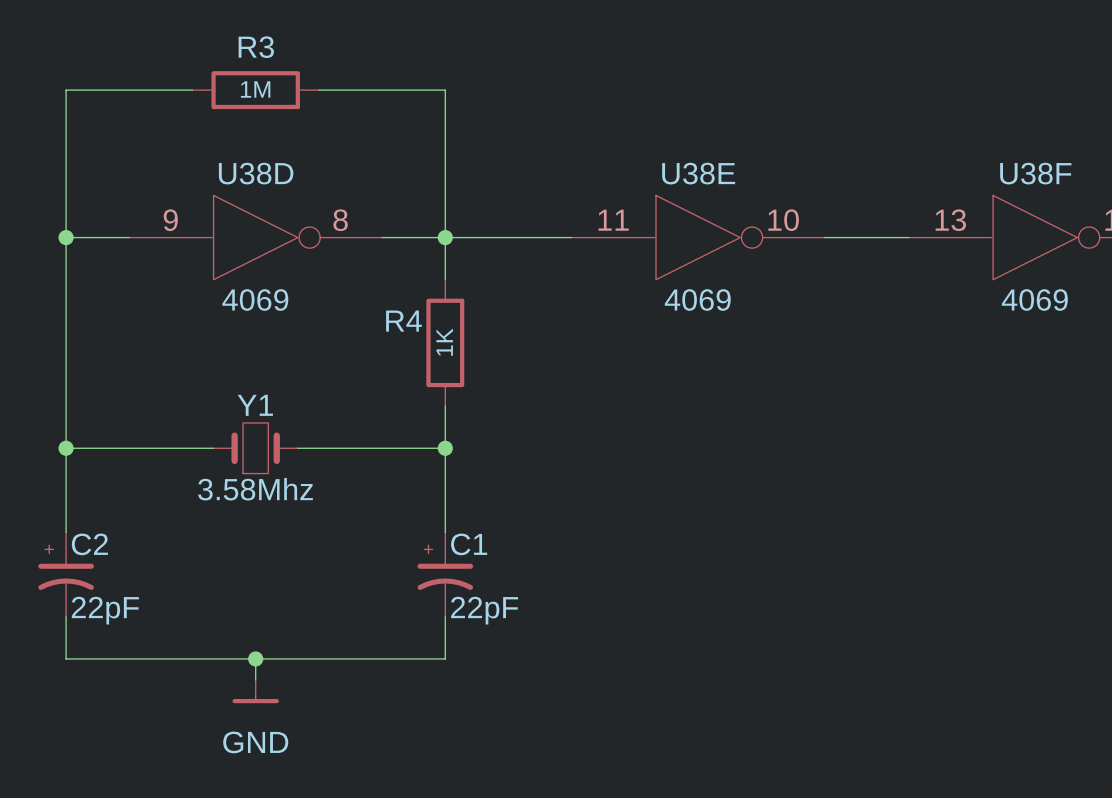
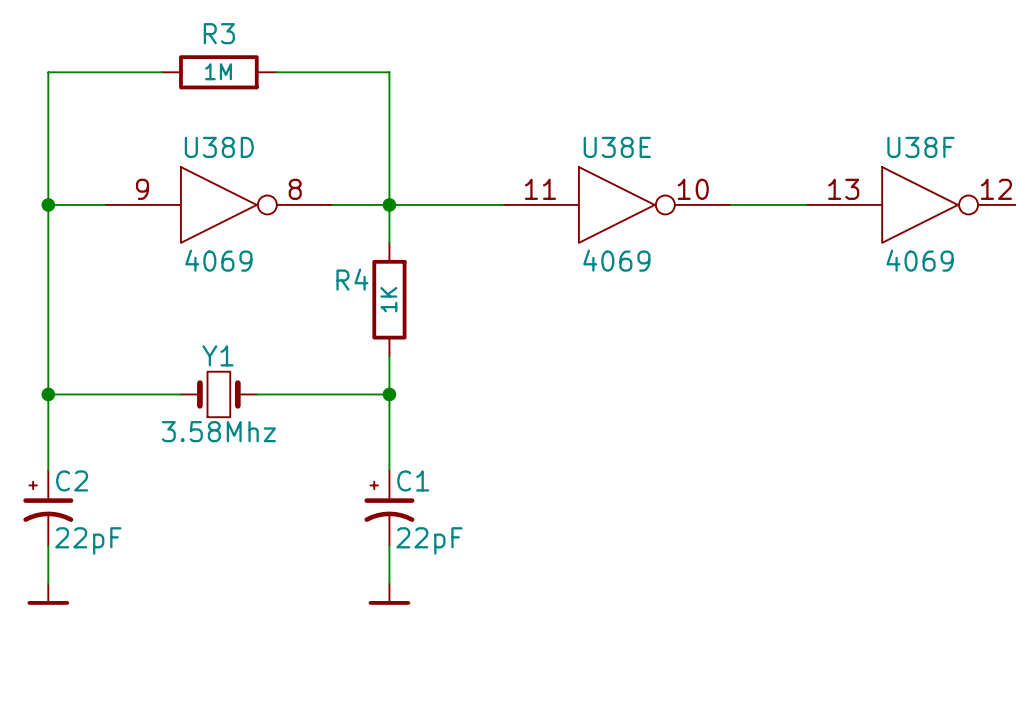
wire: (66, 658) (445, 658) -> none
wire: (255, 658) (255, 680) -> none
junction: (255, 658) -> none
power symbol: none -> (48, 594)
power symbol: none -> (389, 594)
power symbol: GND (255, 691) -> none

